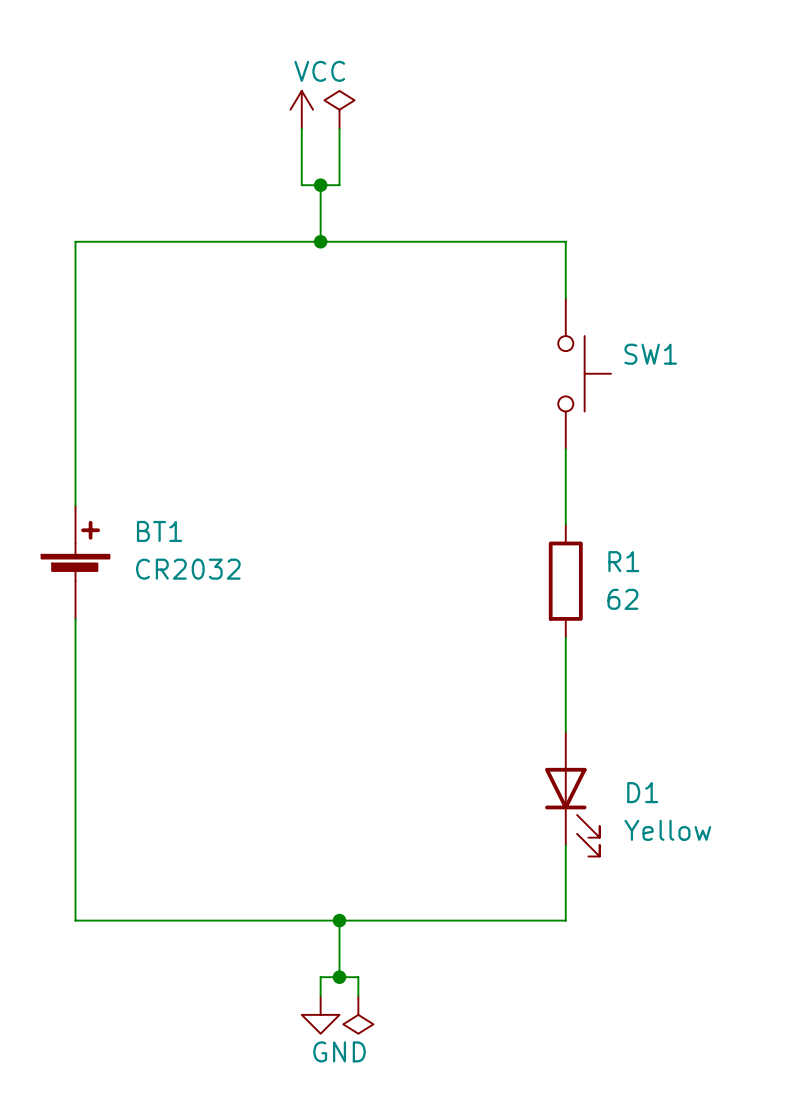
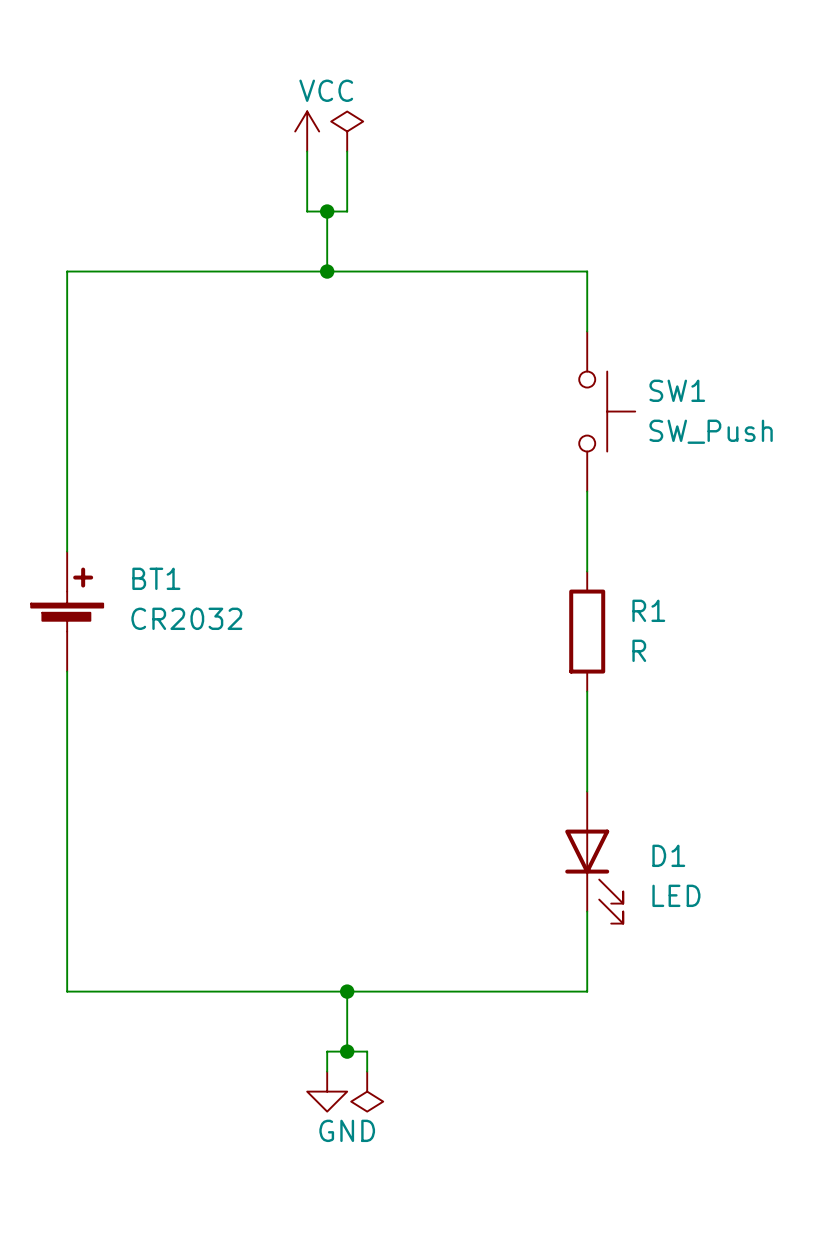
SW1 value: none -> SW_Push (711, 431)
R1 value: 62 (622, 599) -> R (639, 650)
D1 value: Yellow (667, 830) -> LED (676, 895)

